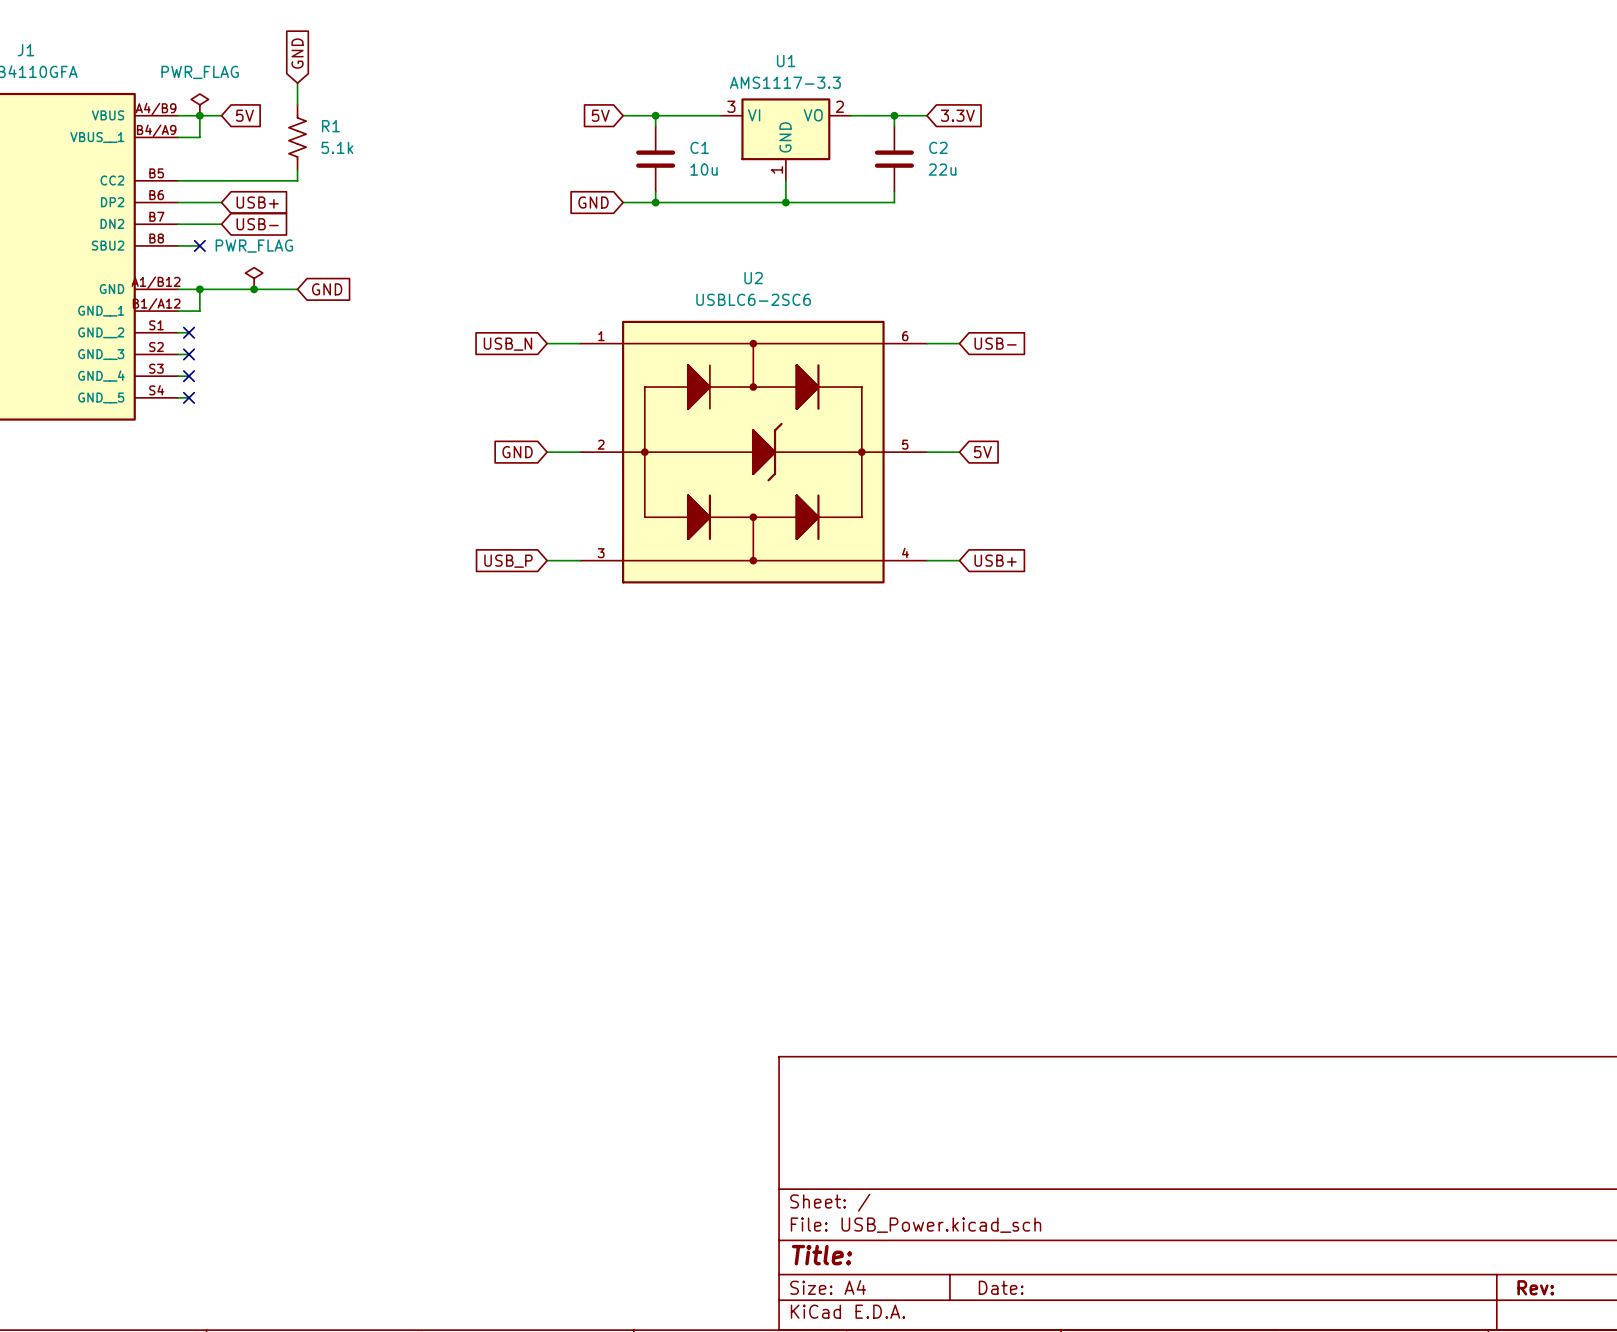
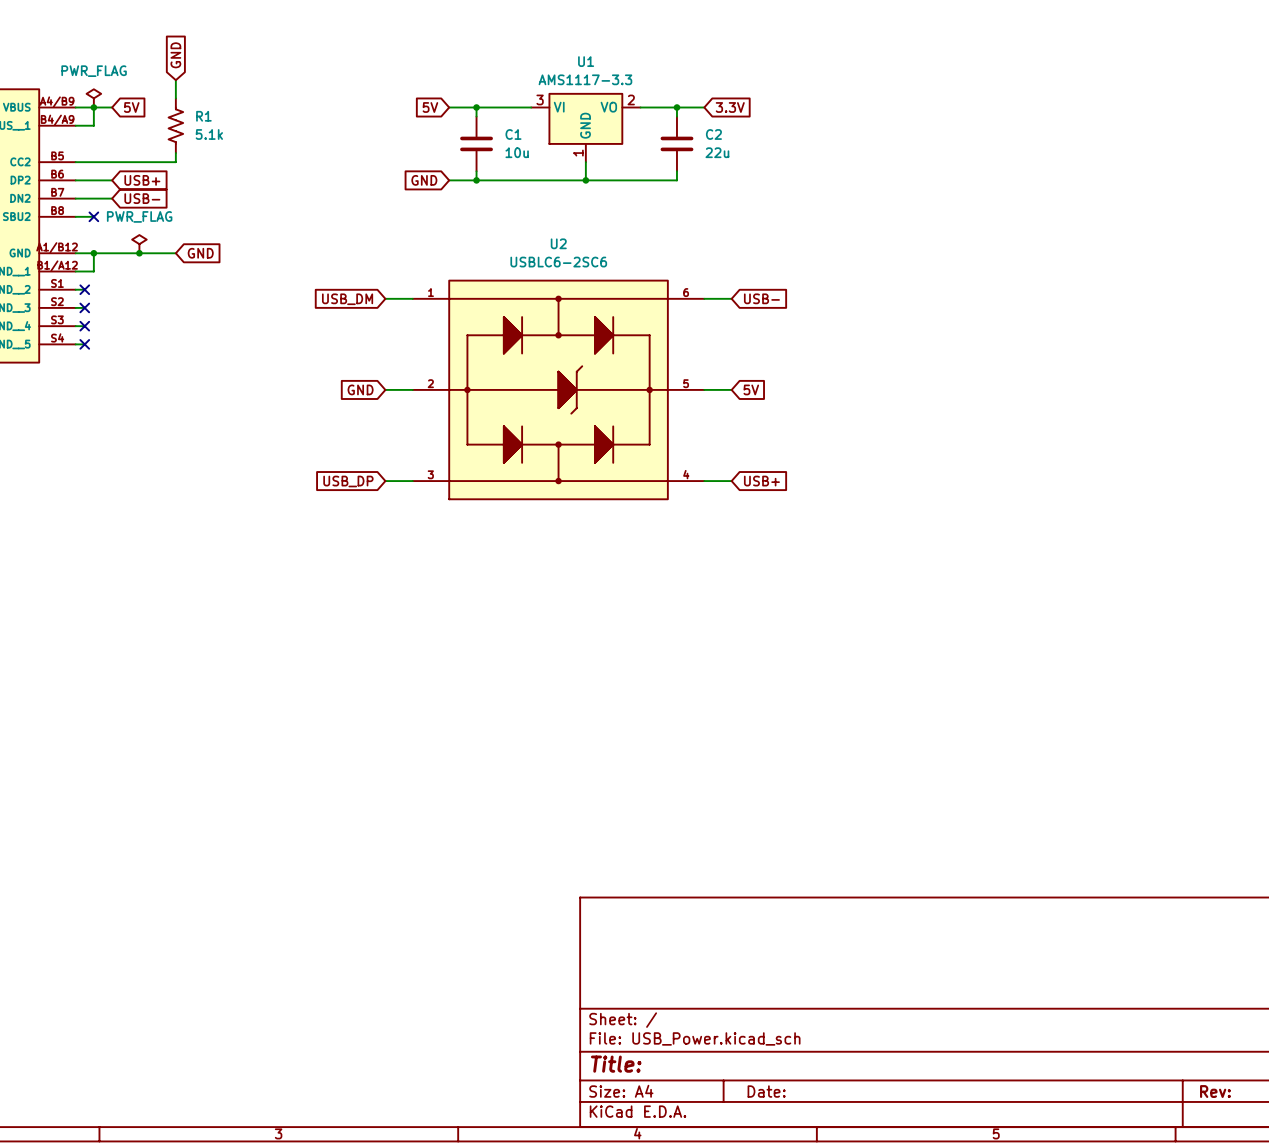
global label: USB_N (507, 344) -> USB_DM (347, 299)
global label: USB_P (508, 561) -> USB_DP (348, 481)

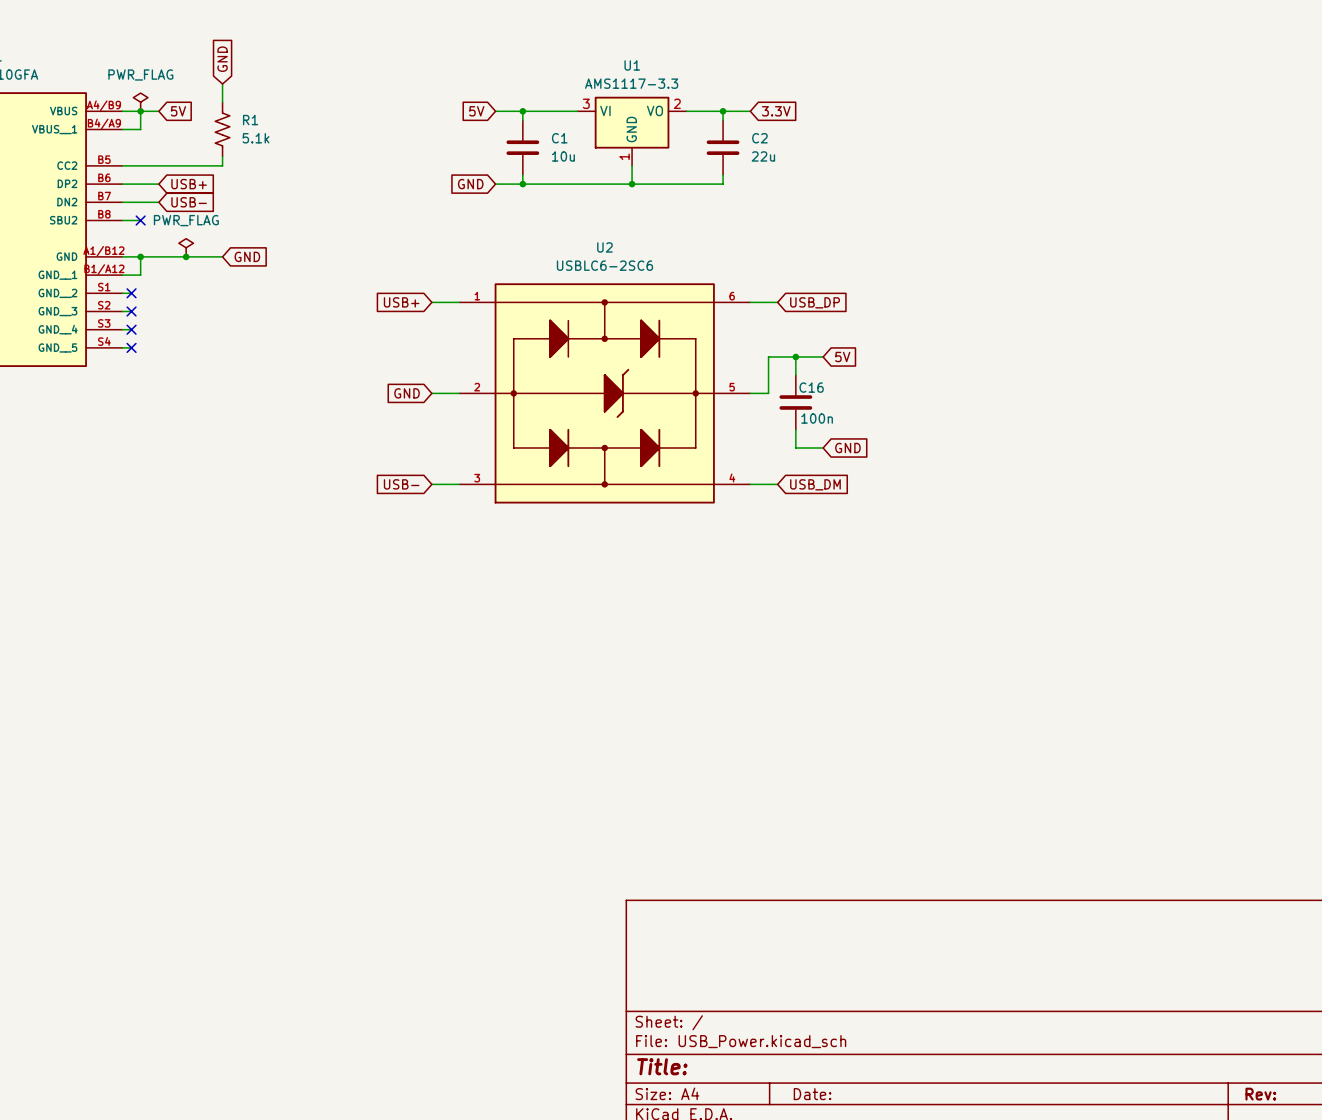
global label: USB- (761, 298) -> USB_DP (815, 302)
global label: USB_DM (347, 299) -> USB+ (401, 302)
wire: none -> (795, 357) (795, 375)
junction: none -> (795, 357)
wire: (722, 389) (731, 389) -> (768, 393) (768, 357) (823, 357)
global label position: 5V (751, 389) -> 5V (842, 357)
C16: none -> 100n (795, 402)
wire: none -> (795, 429) (795, 447) (823, 447)
global label: none -> GND (847, 447)
global label: USB_DP (348, 481) -> USB- (401, 484)
global label: USB+ (761, 481) -> USB_DM (815, 484)

